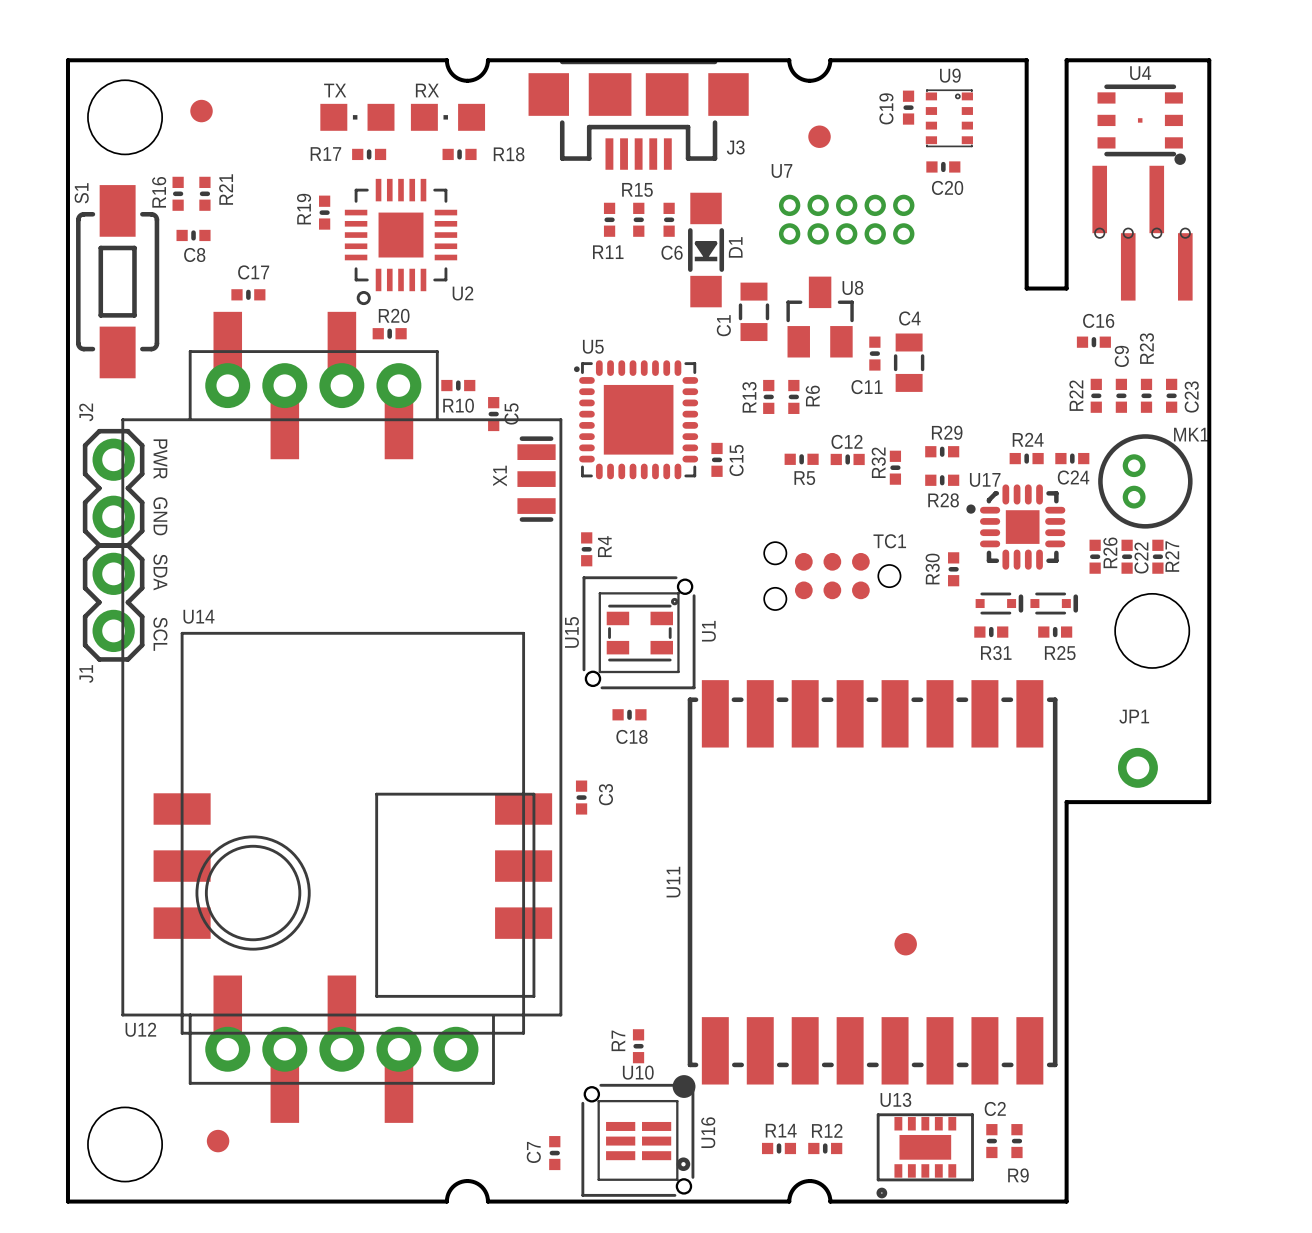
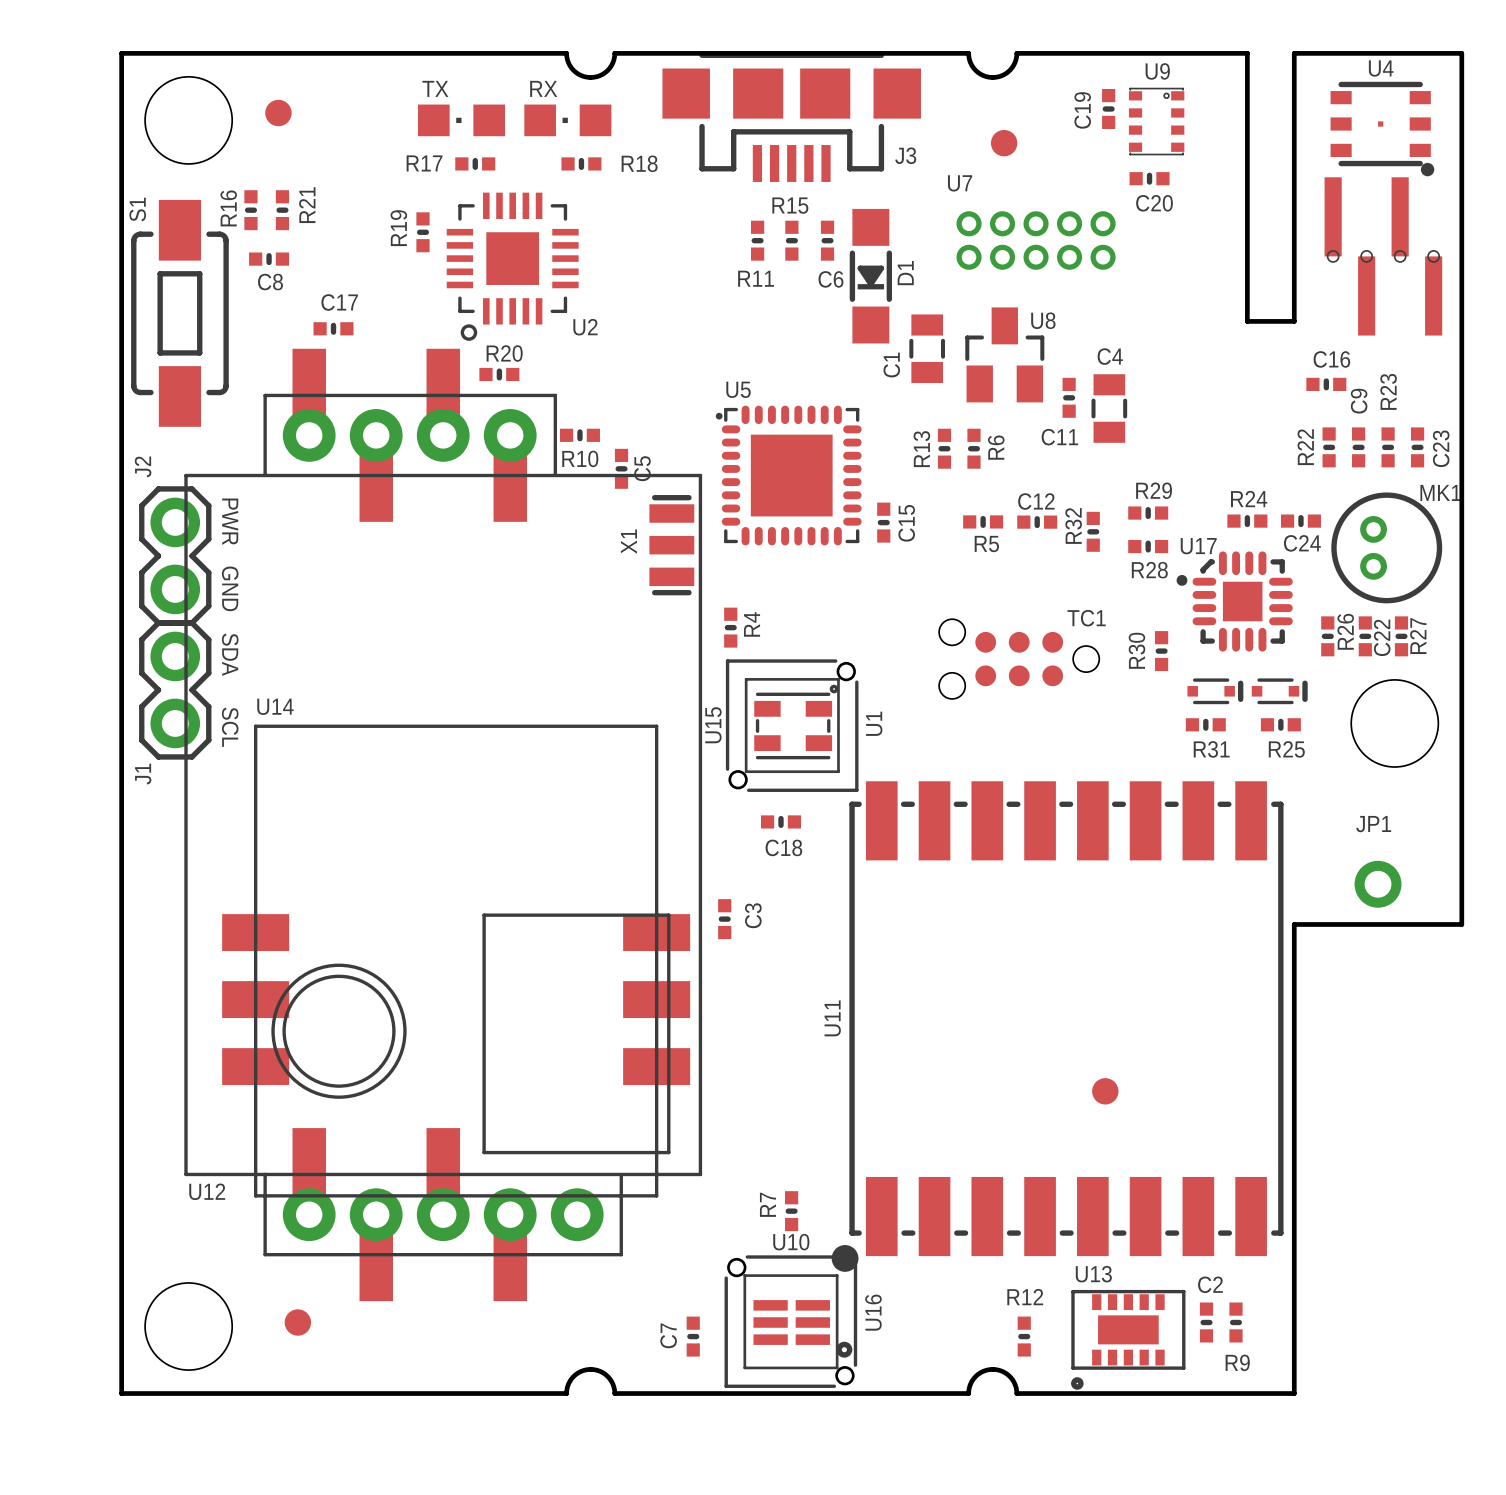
R14: (779, 1148) -> none
R12 rotation: 0° (825, 1148) -> 90° clockwise (1024, 1336)

